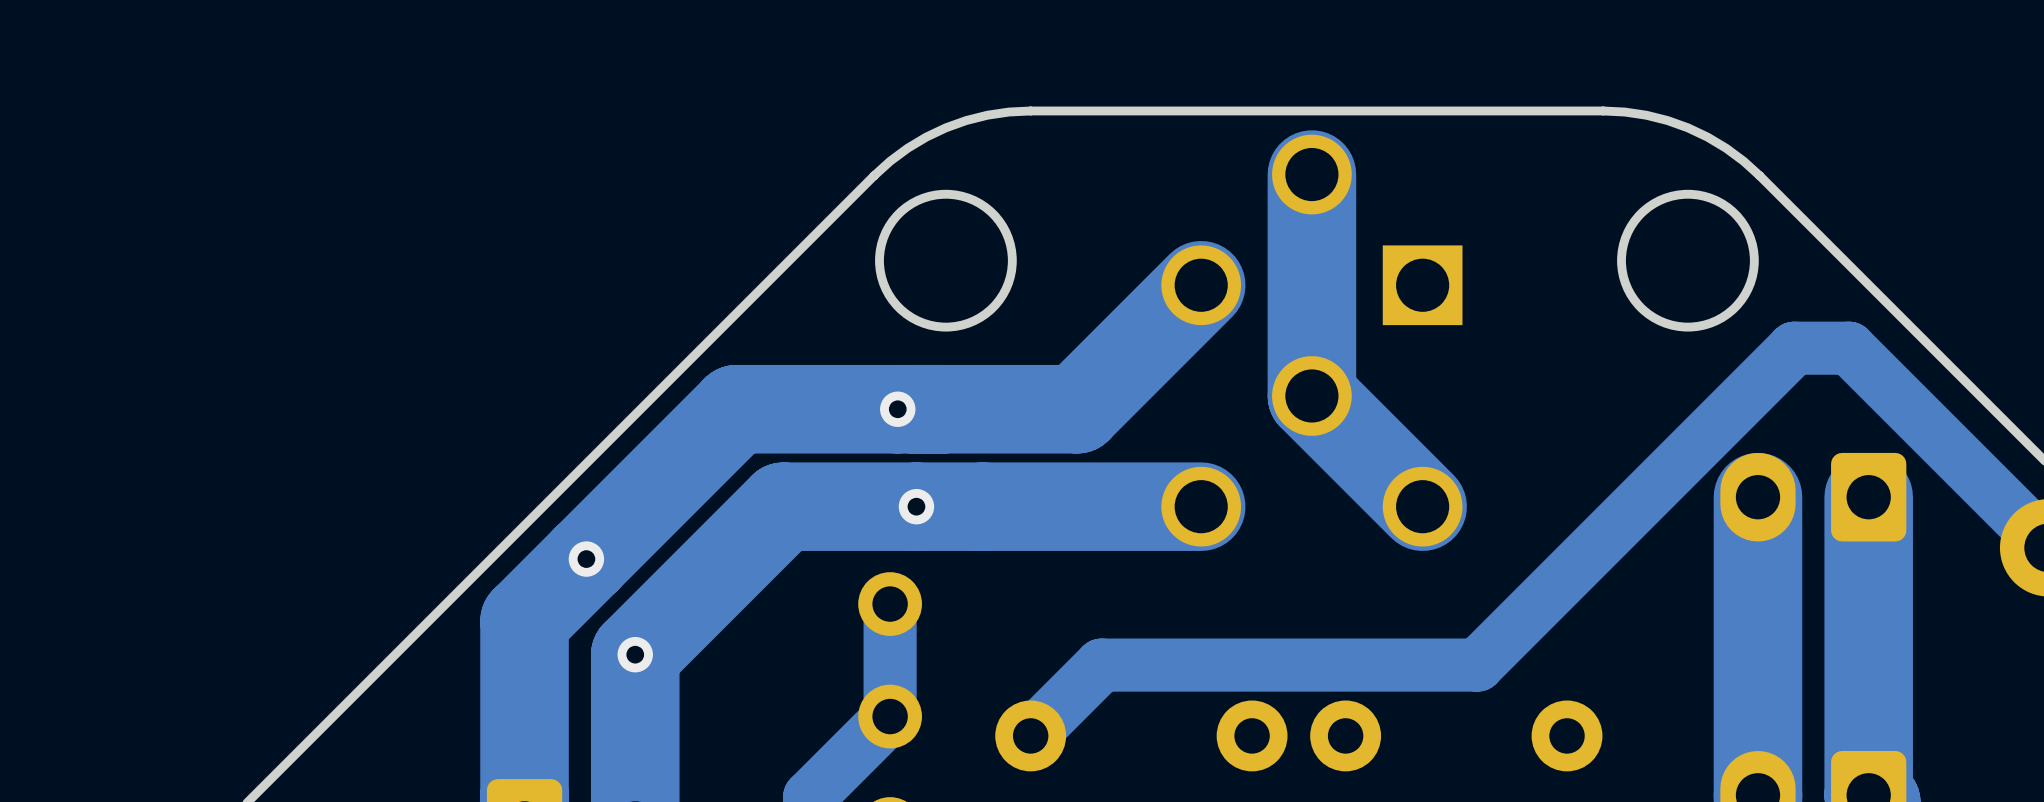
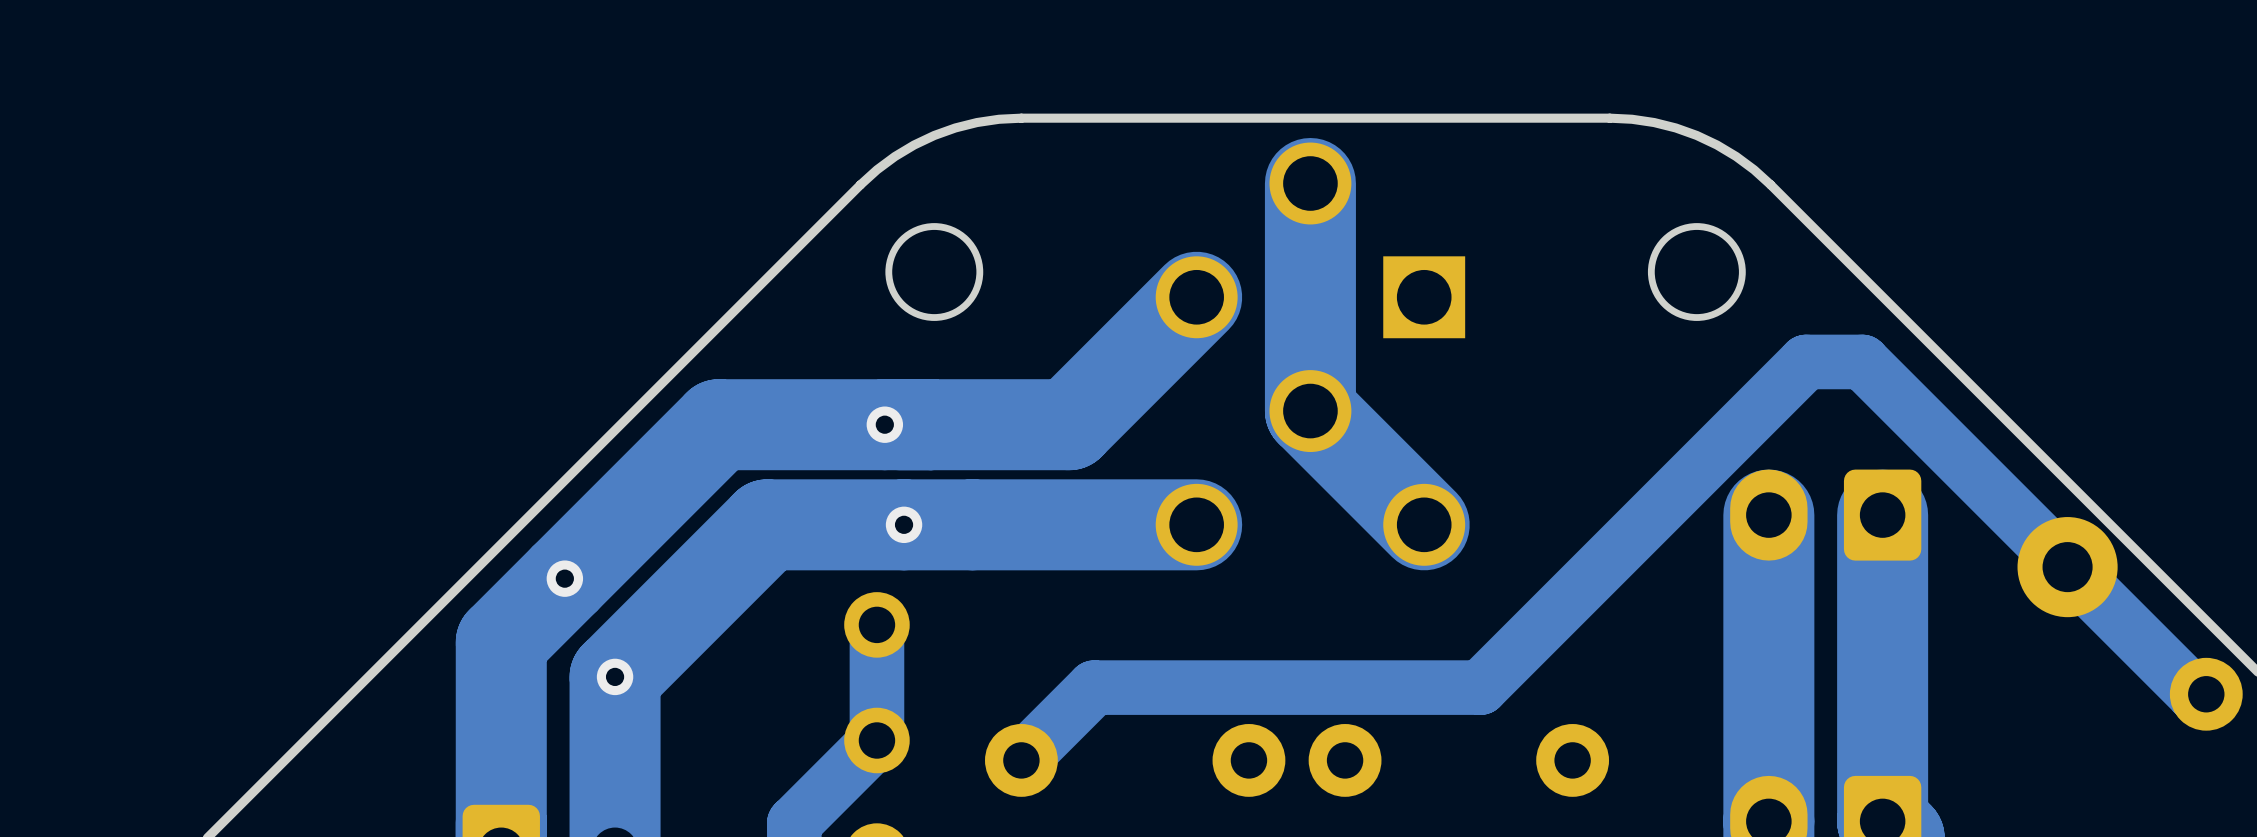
round board edge size: [875, 189, 1017, 332] -> [885, 223, 984, 321]
round board edge size: [1617, 189, 1759, 332] -> [1647, 223, 1746, 321]

